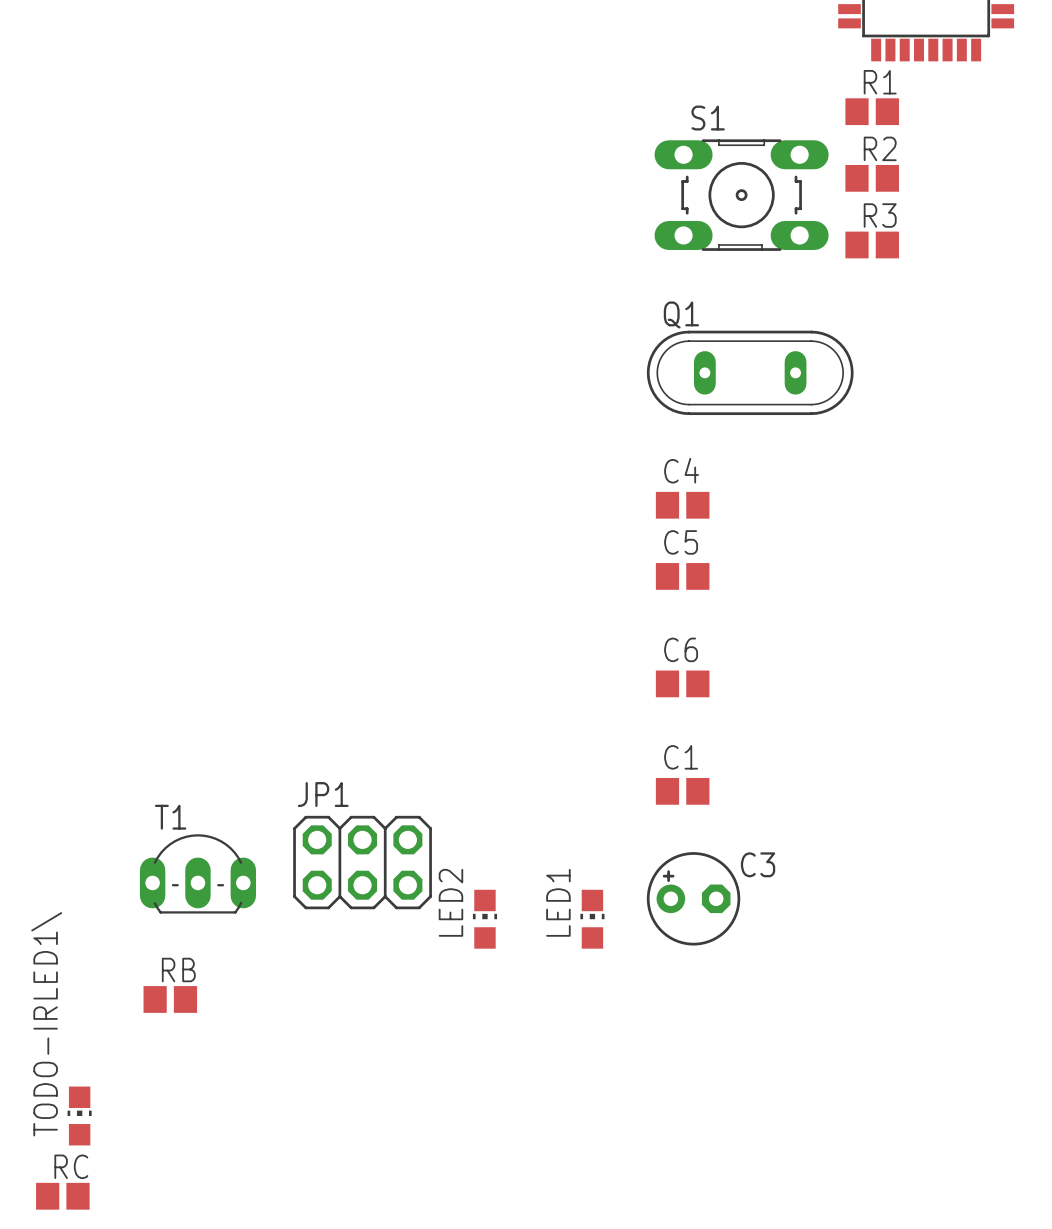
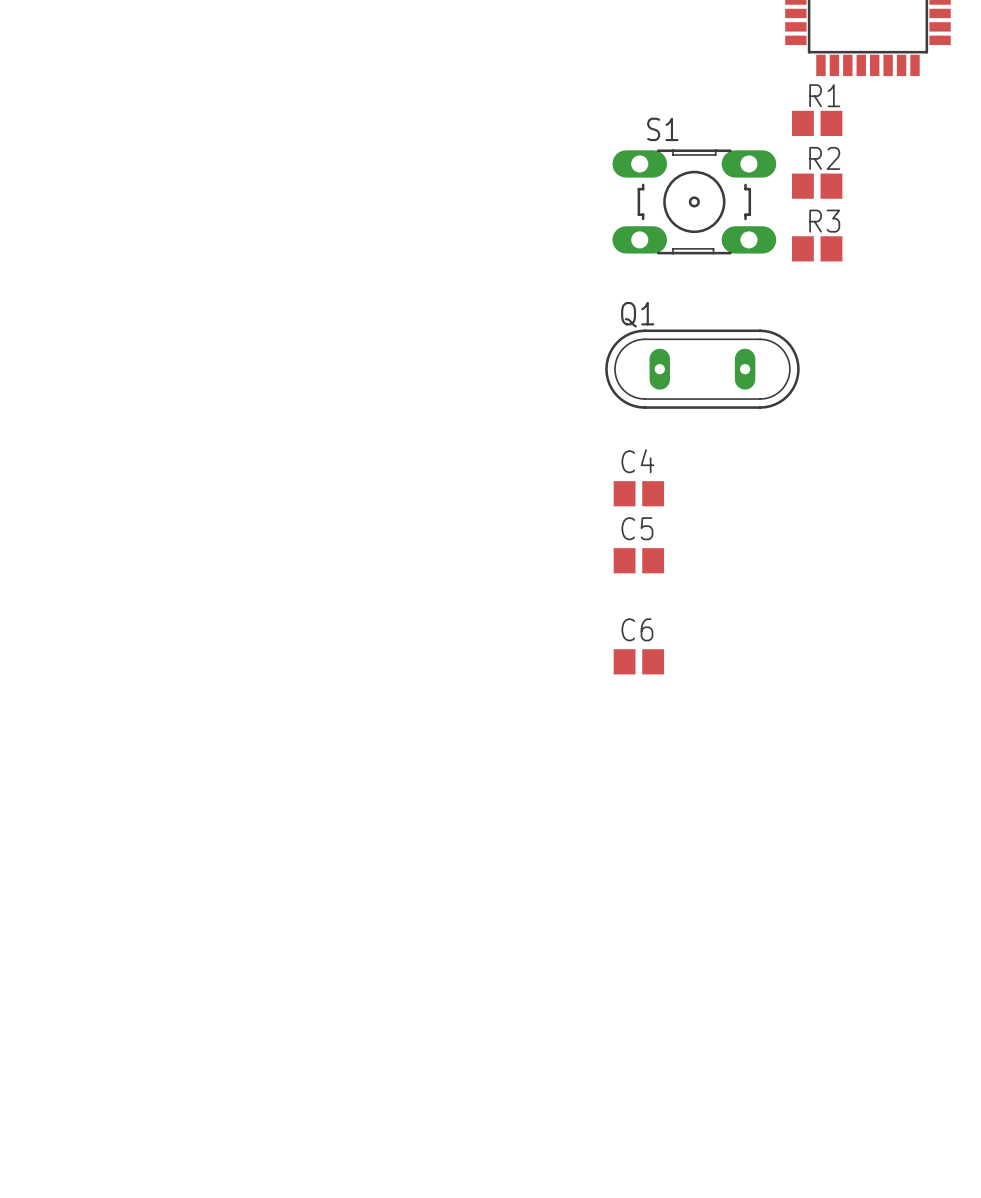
C1: (682, 791) -> none
JP1: (362, 862) -> none
T1: (197, 873) -> none
C3: (693, 898) -> none
LED2: (484, 919) -> none
LED1: (592, 919) -> none
RB: (170, 999) -> none
TODO-IRLED1\: (79, 1116) -> none
RC: (62, 1196) -> none

